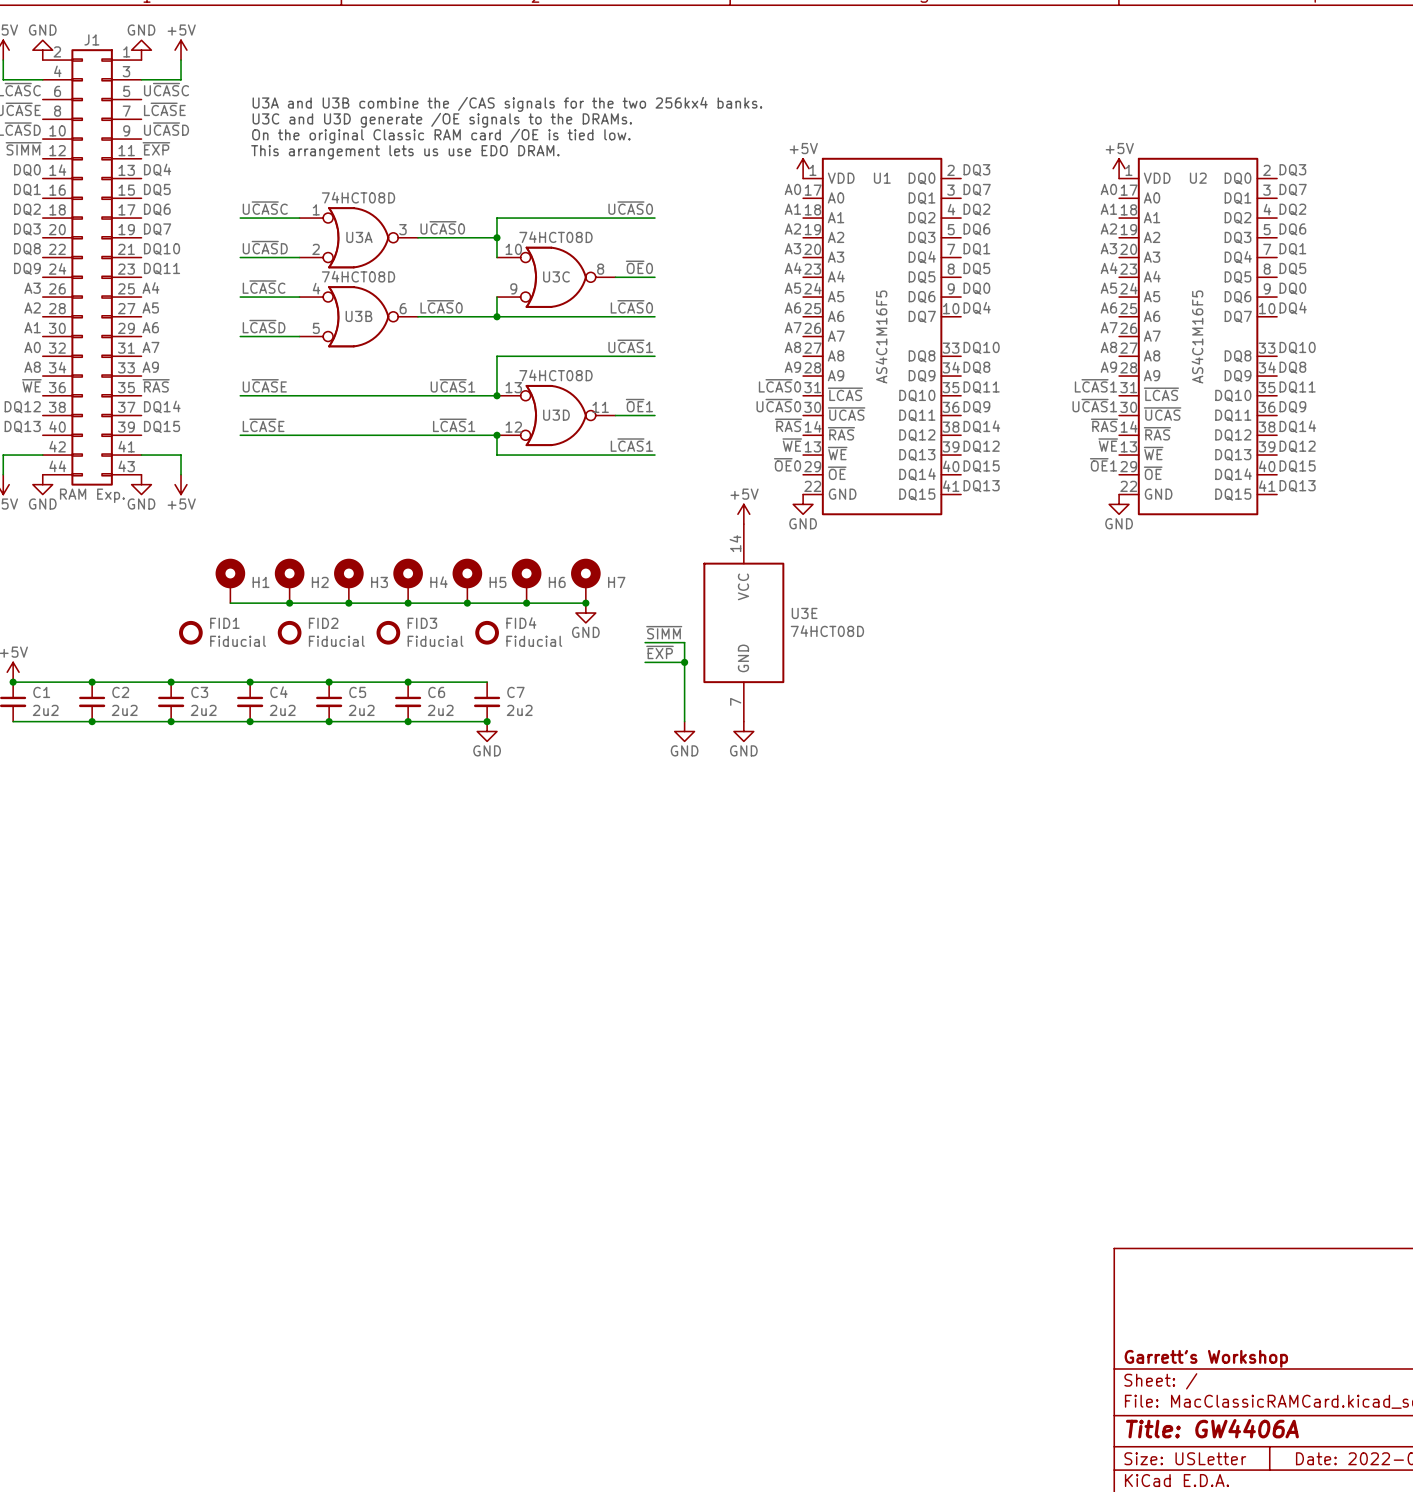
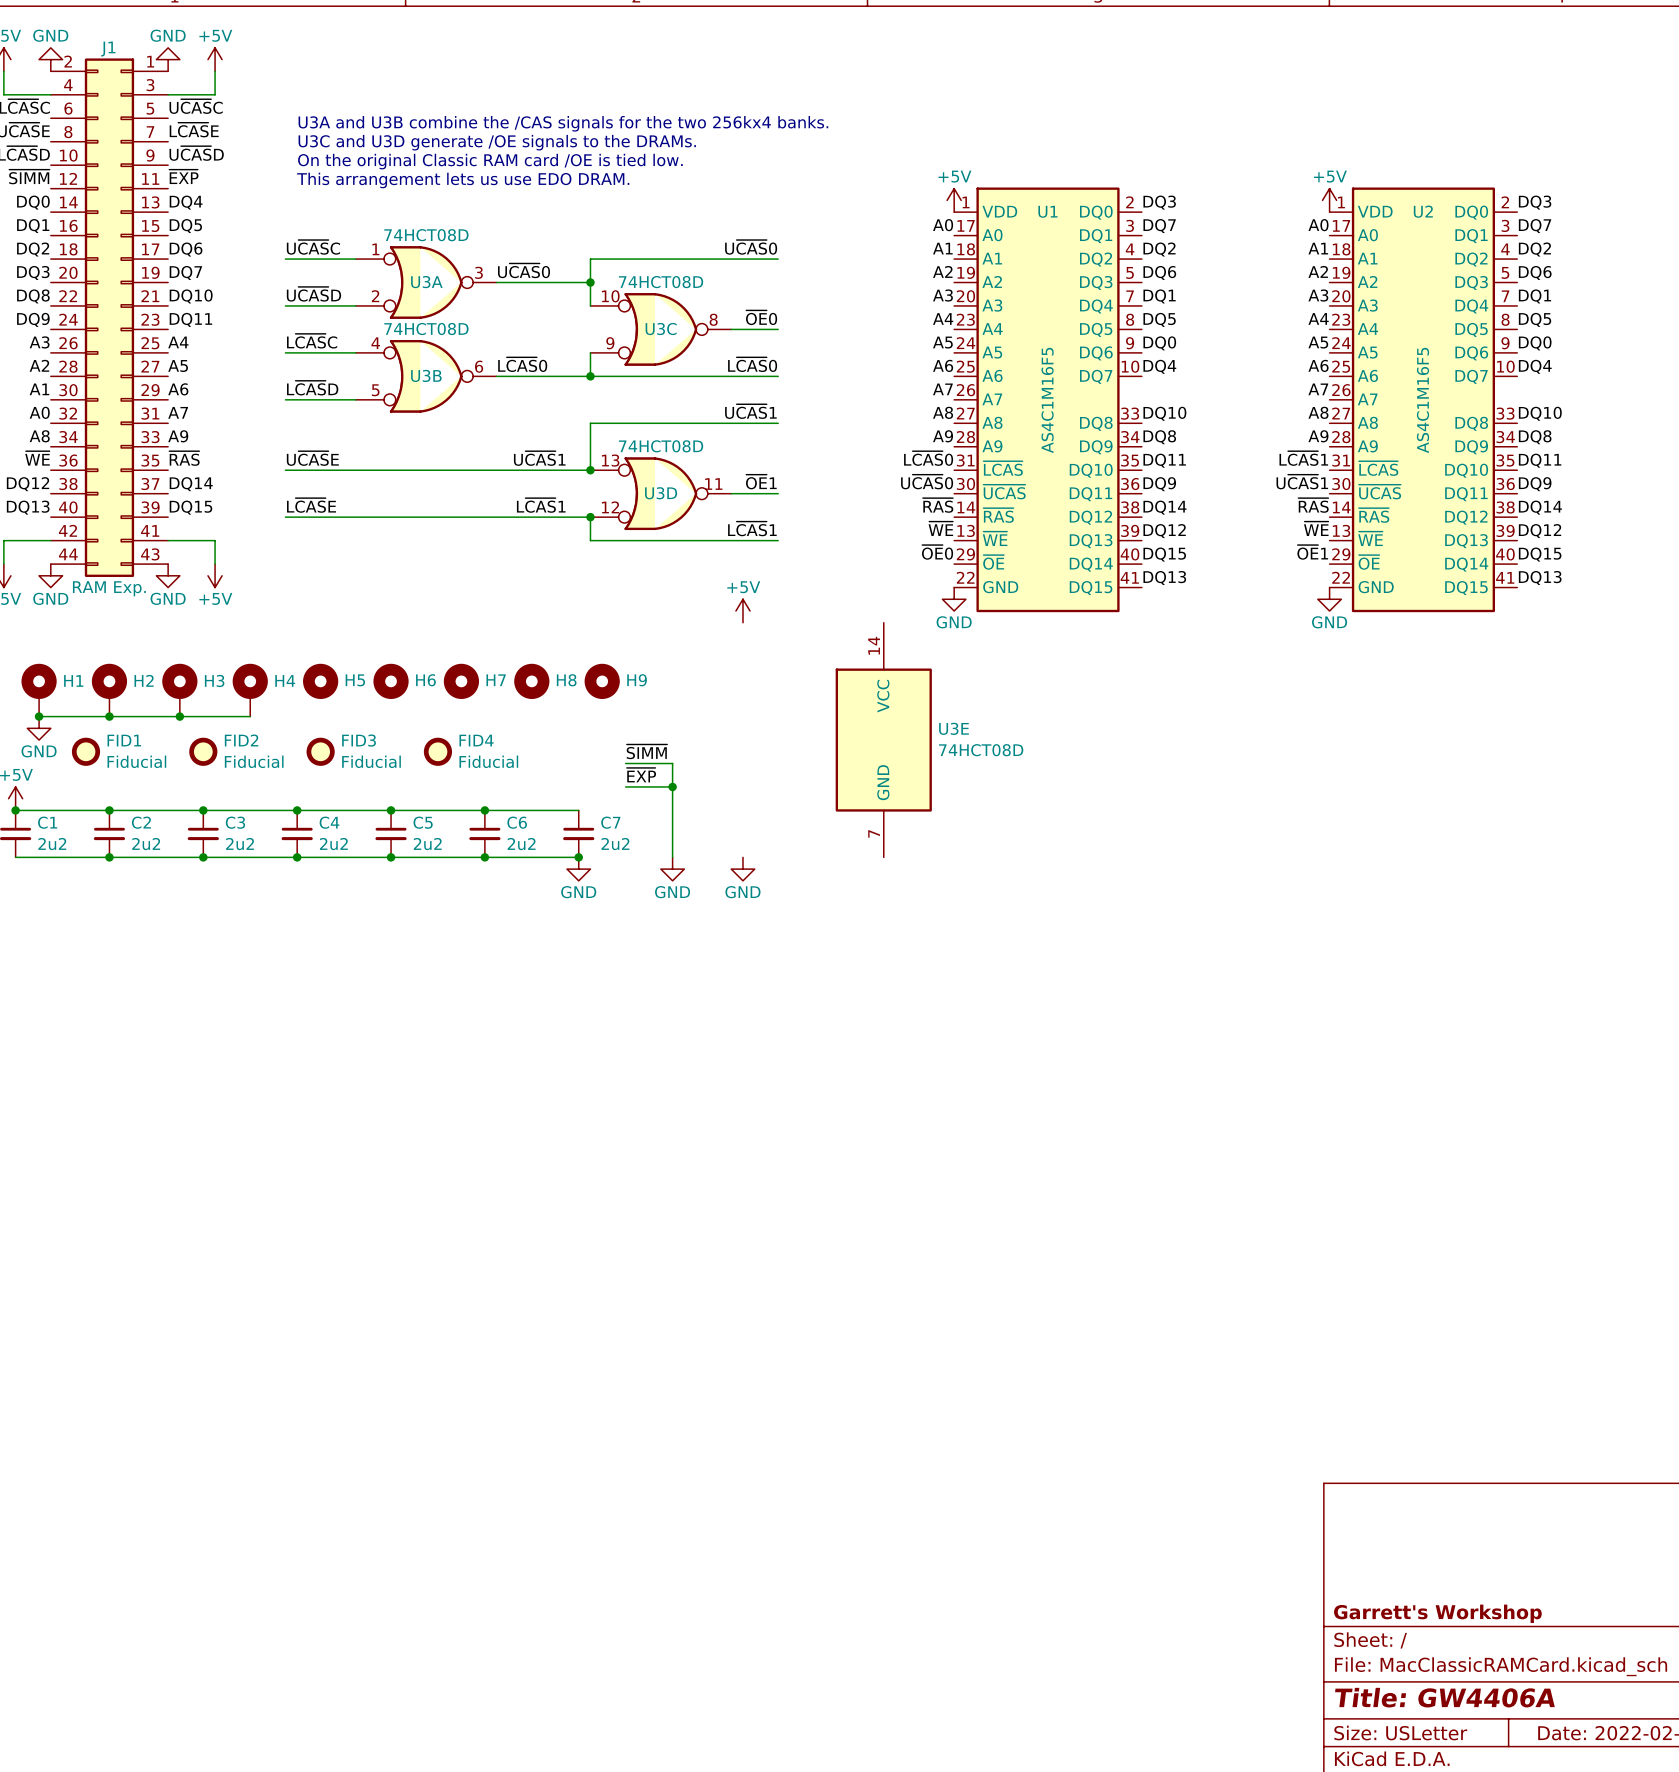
power symbol position: +5V (743, 514) -> +5V (742, 611)
H5 symbol: [452, 558, 483, 604] -> [303, 663, 339, 699]
H6 symbol: [511, 558, 542, 604] -> [373, 663, 409, 699]
H7 symbol: [571, 558, 601, 604] -> [443, 663, 480, 699]
H8: none -> (531, 681)
H9: none -> (602, 681)
H1 position: (230, 580) -> (39, 690)
H2 position: (289, 580) -> (109, 690)
H3 position: (348, 580) -> (179, 690)
H4 position: (408, 580) -> (250, 690)
H1 name position: H1 (261, 582) -> H1 (73, 680)
H2 name position: H2 (320, 582) -> H2 (144, 680)
H3 name position: H3 (379, 582) -> H3 (214, 680)
H4 name position: H4 (438, 582) -> H4 (285, 680)
wire: none -> (39, 716) (250, 716)
junction: none -> (39, 716)
junction: none -> (109, 716)
junction: none -> (179, 716)
wire: (230, 603) (585, 603) -> none
junction: (289, 603) -> none
junction: (348, 603) -> none
junction: (408, 603) -> none
junction: (467, 603) -> none
junction: (526, 603) -> none
junction: (585, 603) -> none
power symbol: none -> GND (39, 728)
power symbol: GND (585, 613) -> none
FID1 position: (190, 632) -> (86, 751)
FID2 position: (289, 632) -> (203, 751)
FID3 position: (388, 632) -> (320, 751)
FID4 position: (487, 632) -> (437, 751)
label position: ~{SIMM} (664, 632) -> ~{SIMM} (646, 751)
wire: (645, 642) (684, 642) (684, 721) -> (625, 763) (672, 763) (672, 857)
label position: ~{EXP} (659, 652) -> ~{EXP} (641, 775)
junction: none -> (672, 786)
wire: (645, 662) (684, 662) -> (625, 786) (672, 786)
junction: (684, 662) -> none
power symbol: none -> GND (672, 869)
power symbol: none -> GND (742, 869)
power symbol: GND (684, 731) -> none
power symbol: GND (743, 731) -> none

